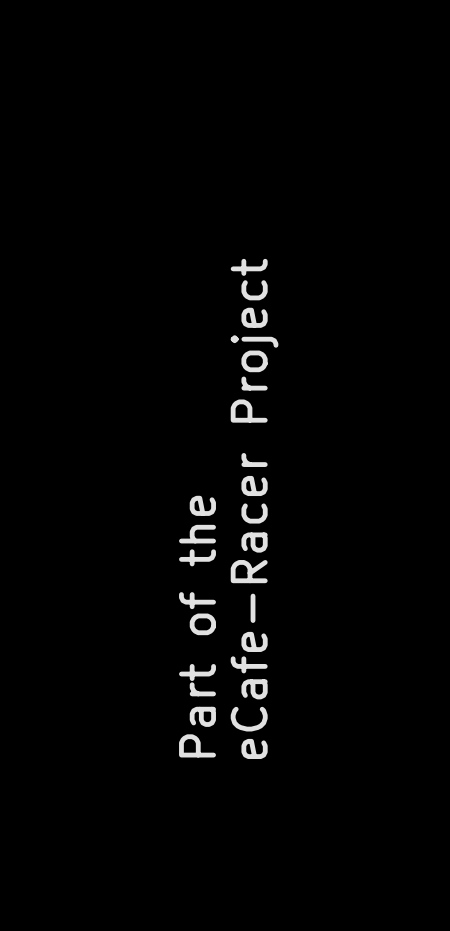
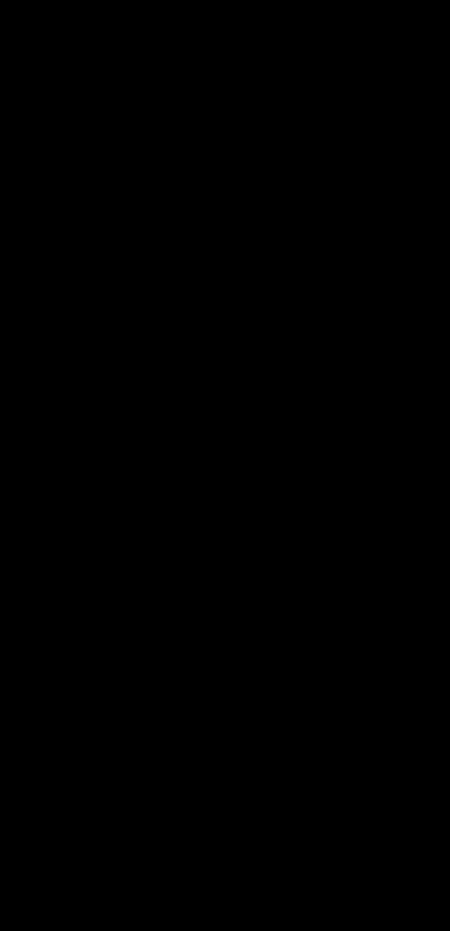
text: eCafe-Racer Project (254, 508) -> none
text: Part of the (197, 626) -> none

